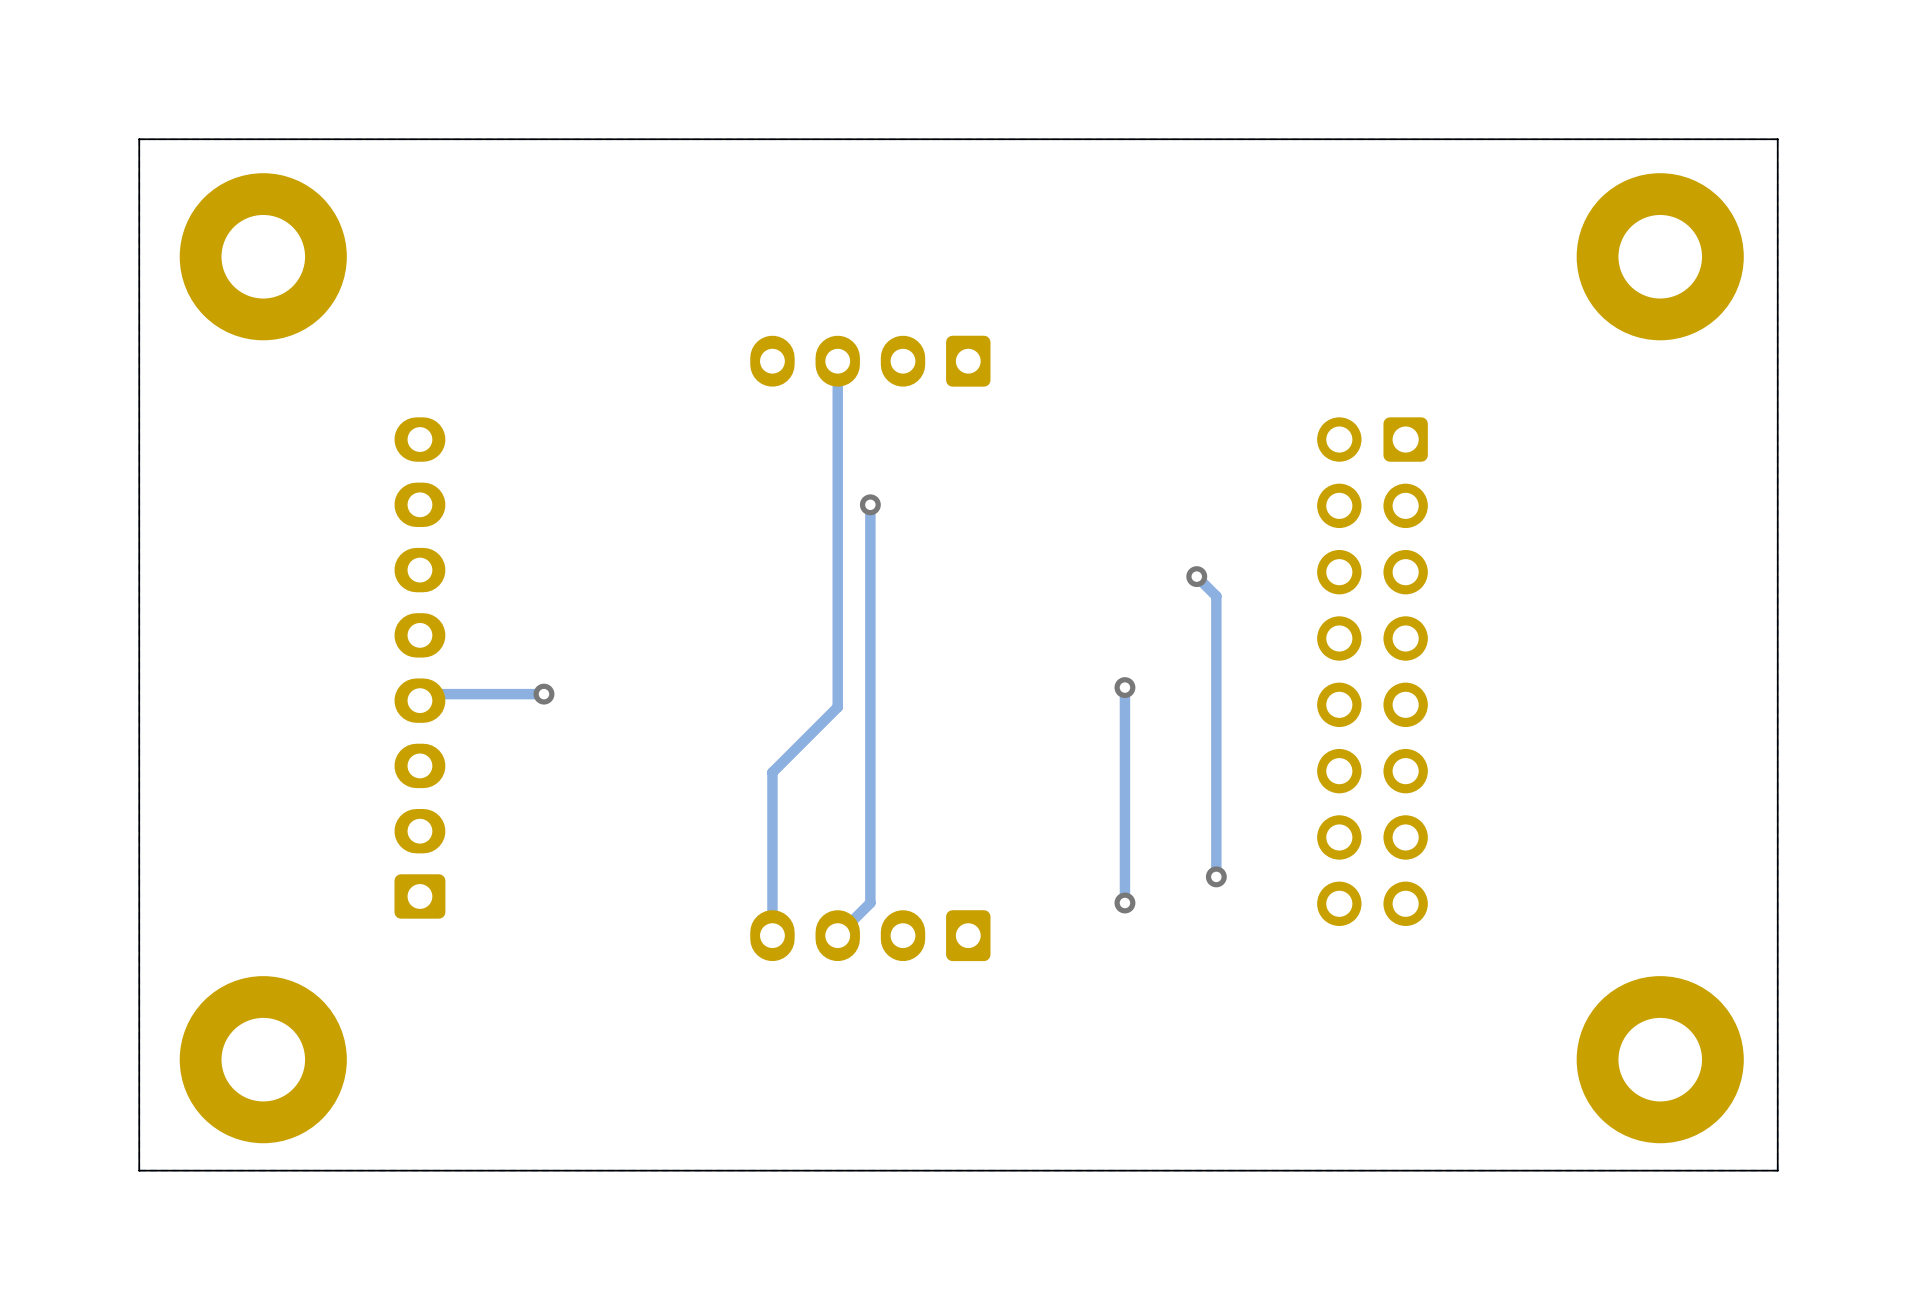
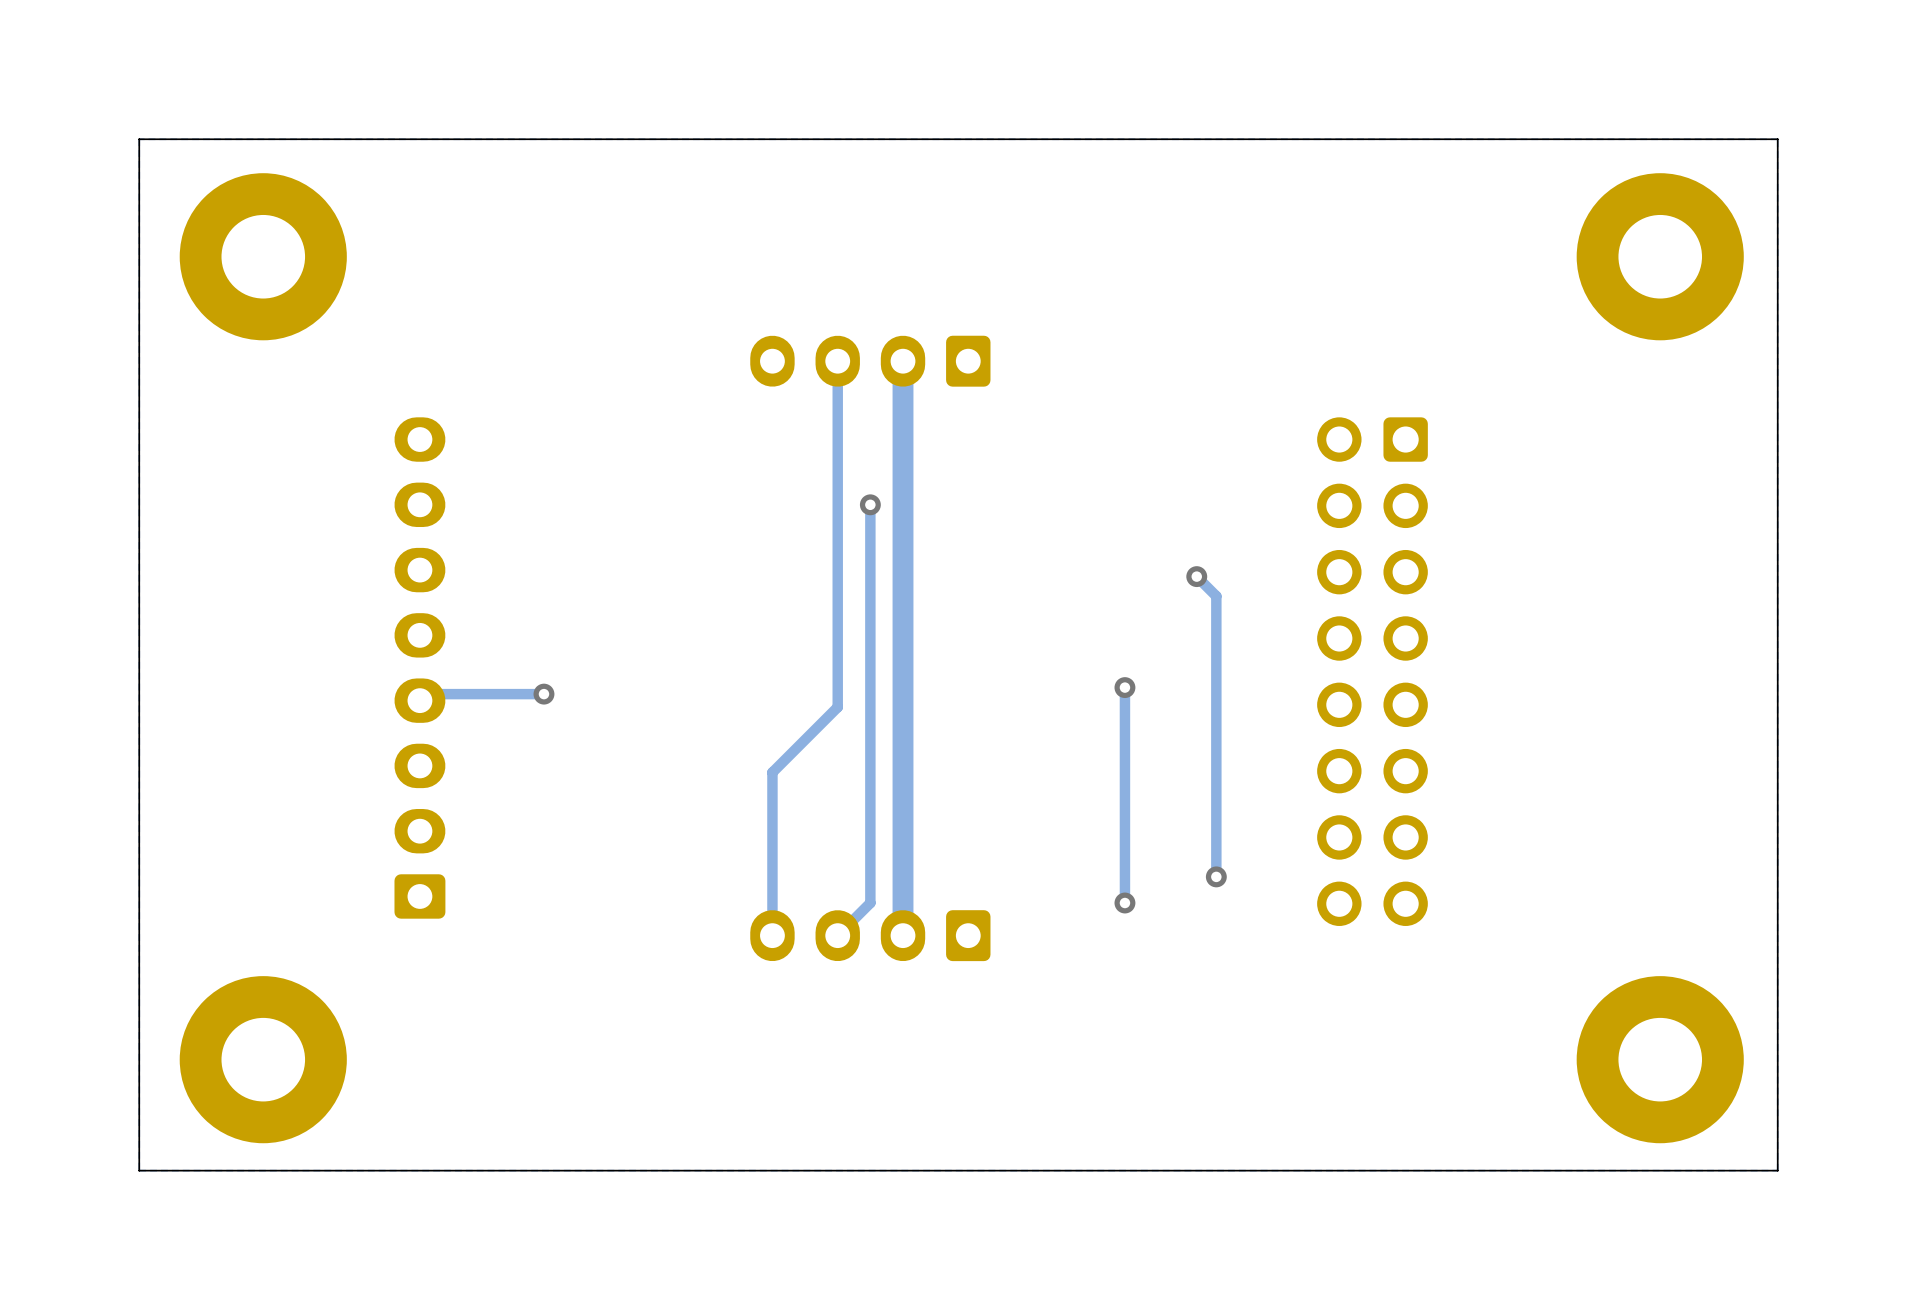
track: none -> (903, 361) (903, 935)

